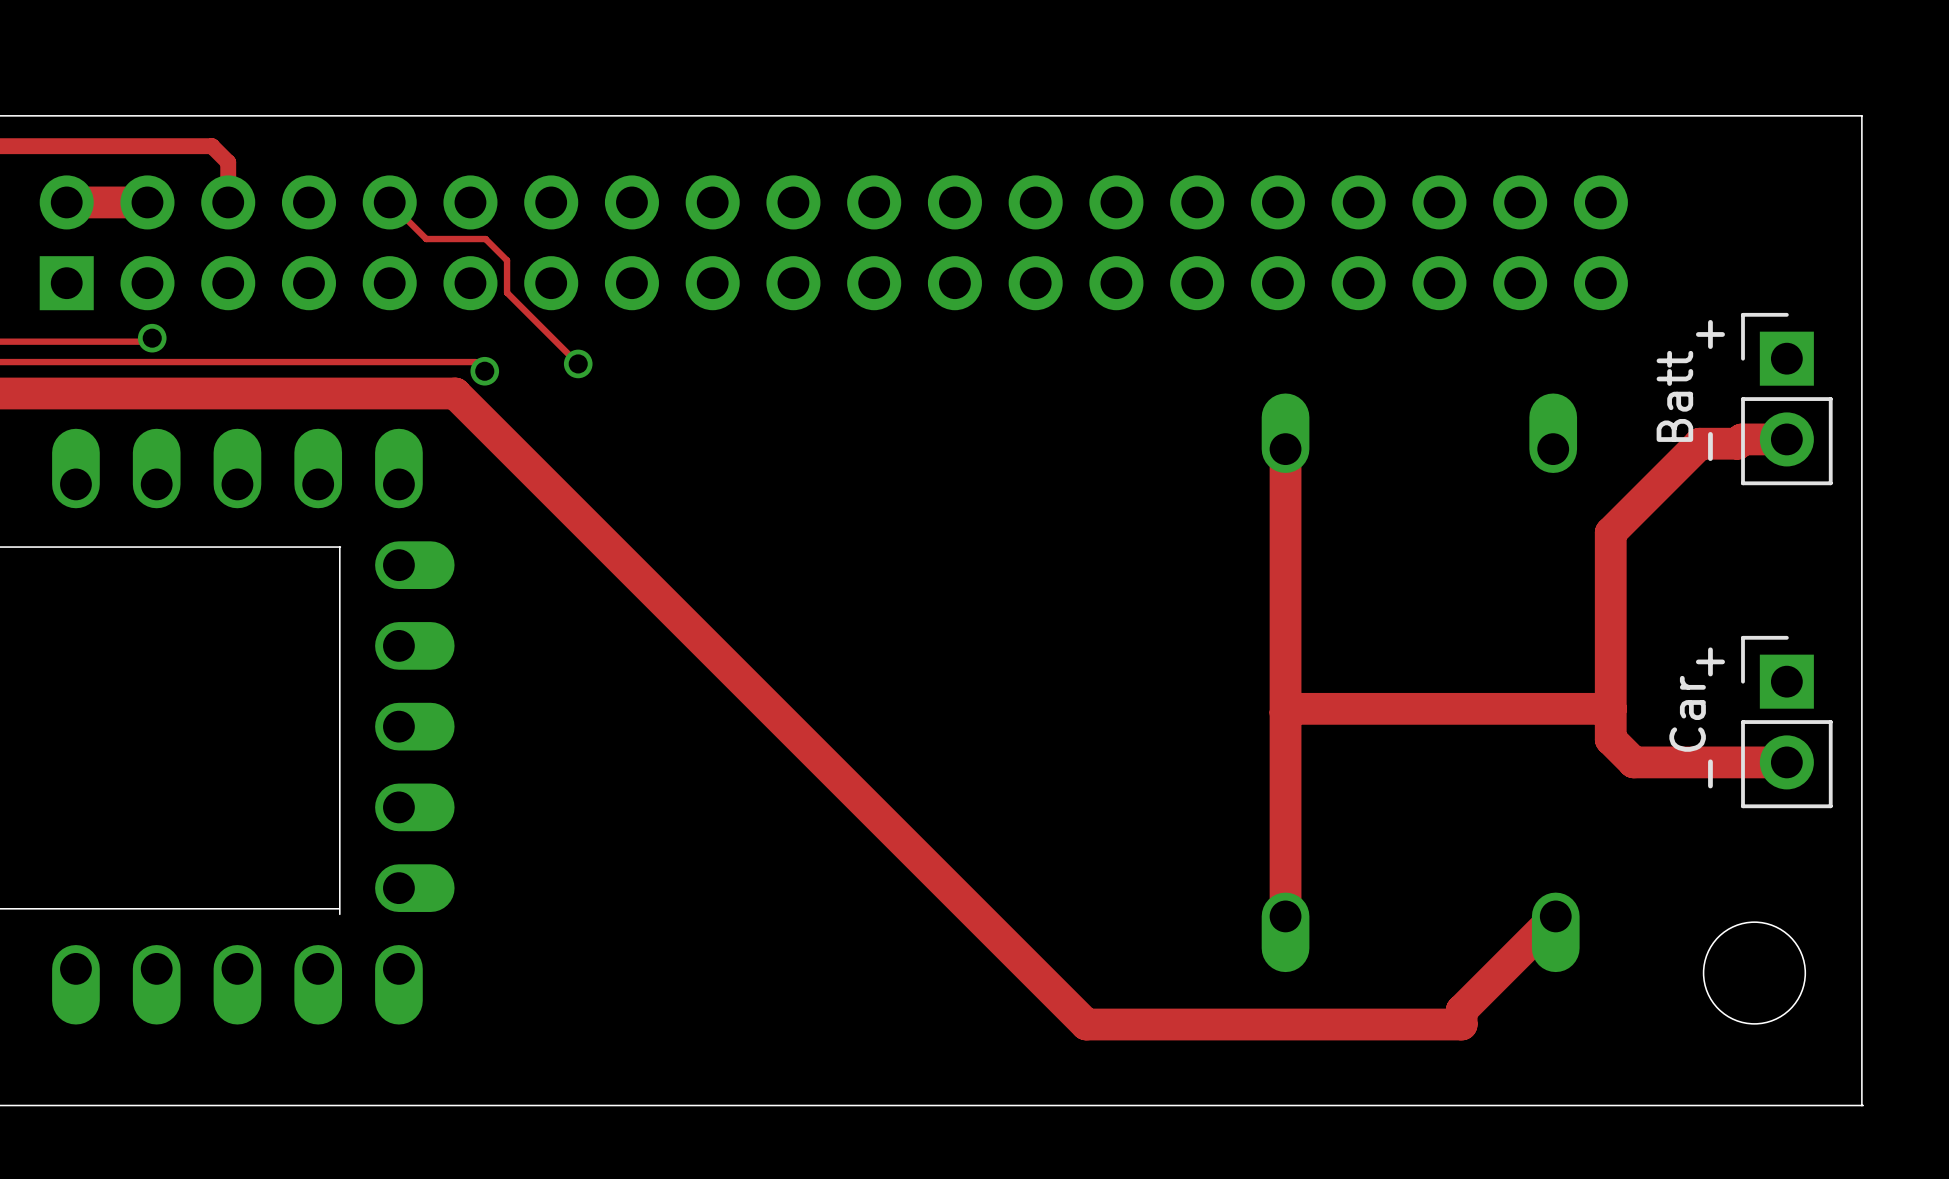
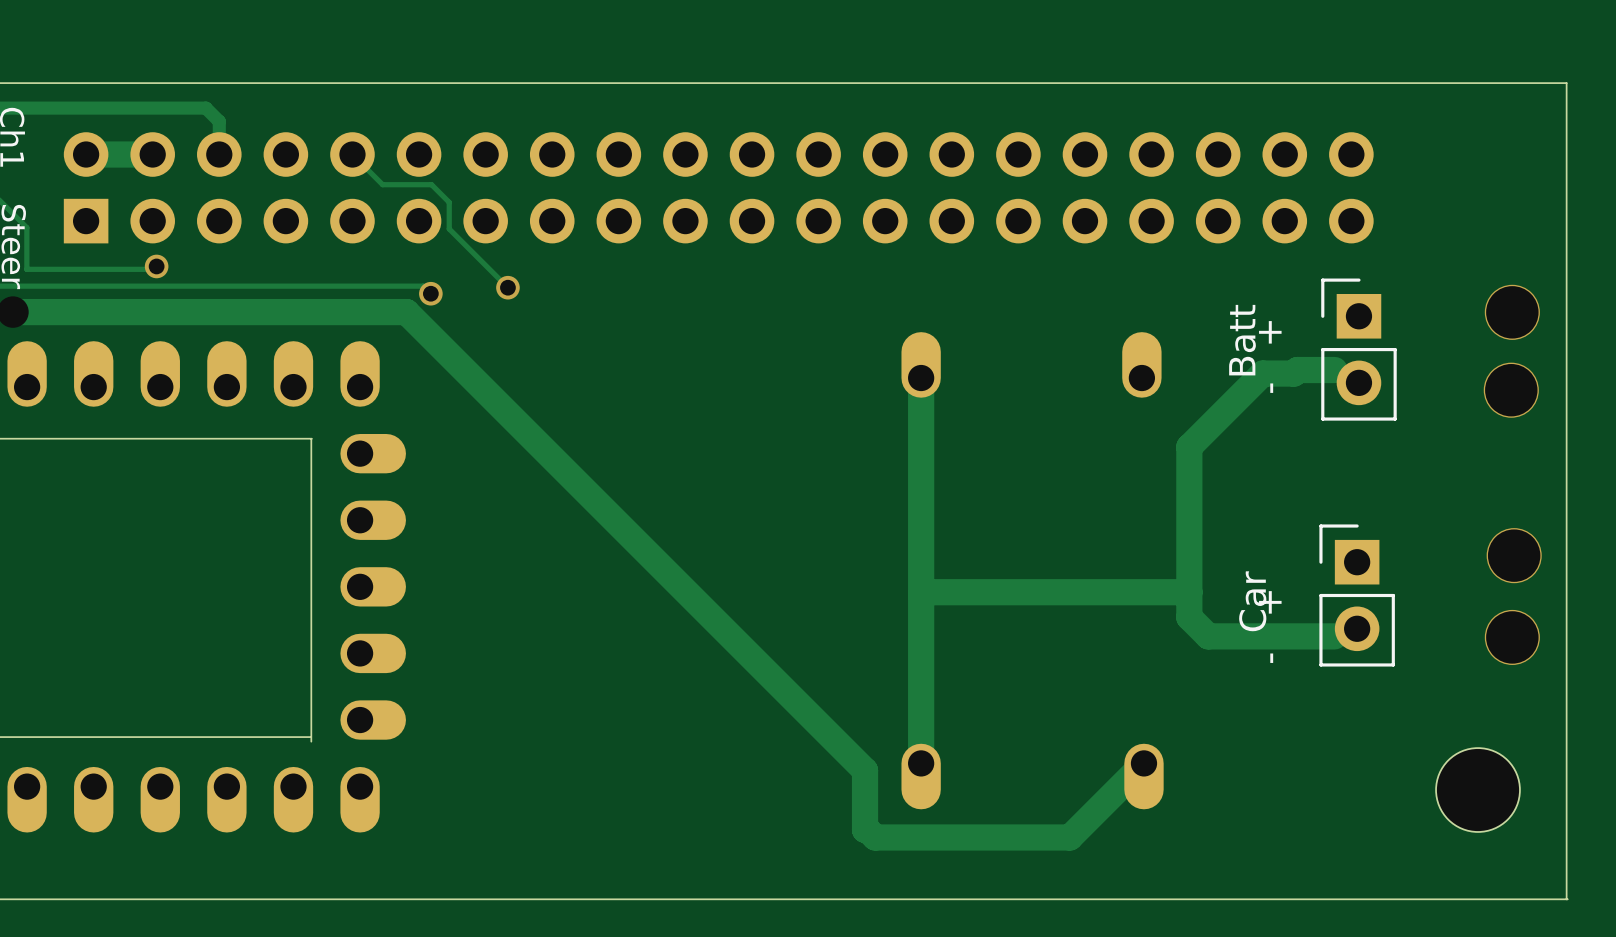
text: - + (1710, 390) -> none
via: none -> (1512, 312)
text position: Batt (1674, 396) -> Batt (1242, 340)
part: (1786, 399) -> none
text: none -> - + (1270, 356)
part position: (1285, 433) -> (1141, 364)
part: (1553, 433) -> none
part: none -> (1358, 349)
track: (1786, 439) (1741, 439) (1737, 443) (1699, 443) (1610, 532) (1610, 739) (1633, 762) (1786, 762) -> (1334, 370) (1297, 370) (1293, 373) (1262, 373) (1189, 446) (1189, 617) (1208, 636) (1334, 636)
track: (1285, 449) (1285, 916) -> (921, 378) (921, 763)
part: none -> (921, 364)
via: none -> (1511, 390)
via: none -> (1514, 555)
track: (1610, 708) (1289, 708) (1285, 712) -> (1189, 592) (924, 592) (921, 595)
text position: Car (1687, 713) -> Car (1252, 601)
text: - + (1710, 717) -> none
part: (1786, 722) -> none
part: none -> (1357, 595)
text: none -> - + (1270, 627)
via: none -> (1512, 637)
track: (1555, 916) (1461, 1010) (1461, 1024) (1086, 1024) (1011, 949) -> (1143, 763) (1069, 837) (875, 837) (867, 829) (865, 829) (865, 770)
part position: (1285, 932) -> (1143, 776)
part: (1555, 932) -> none
part: none -> (921, 776)

